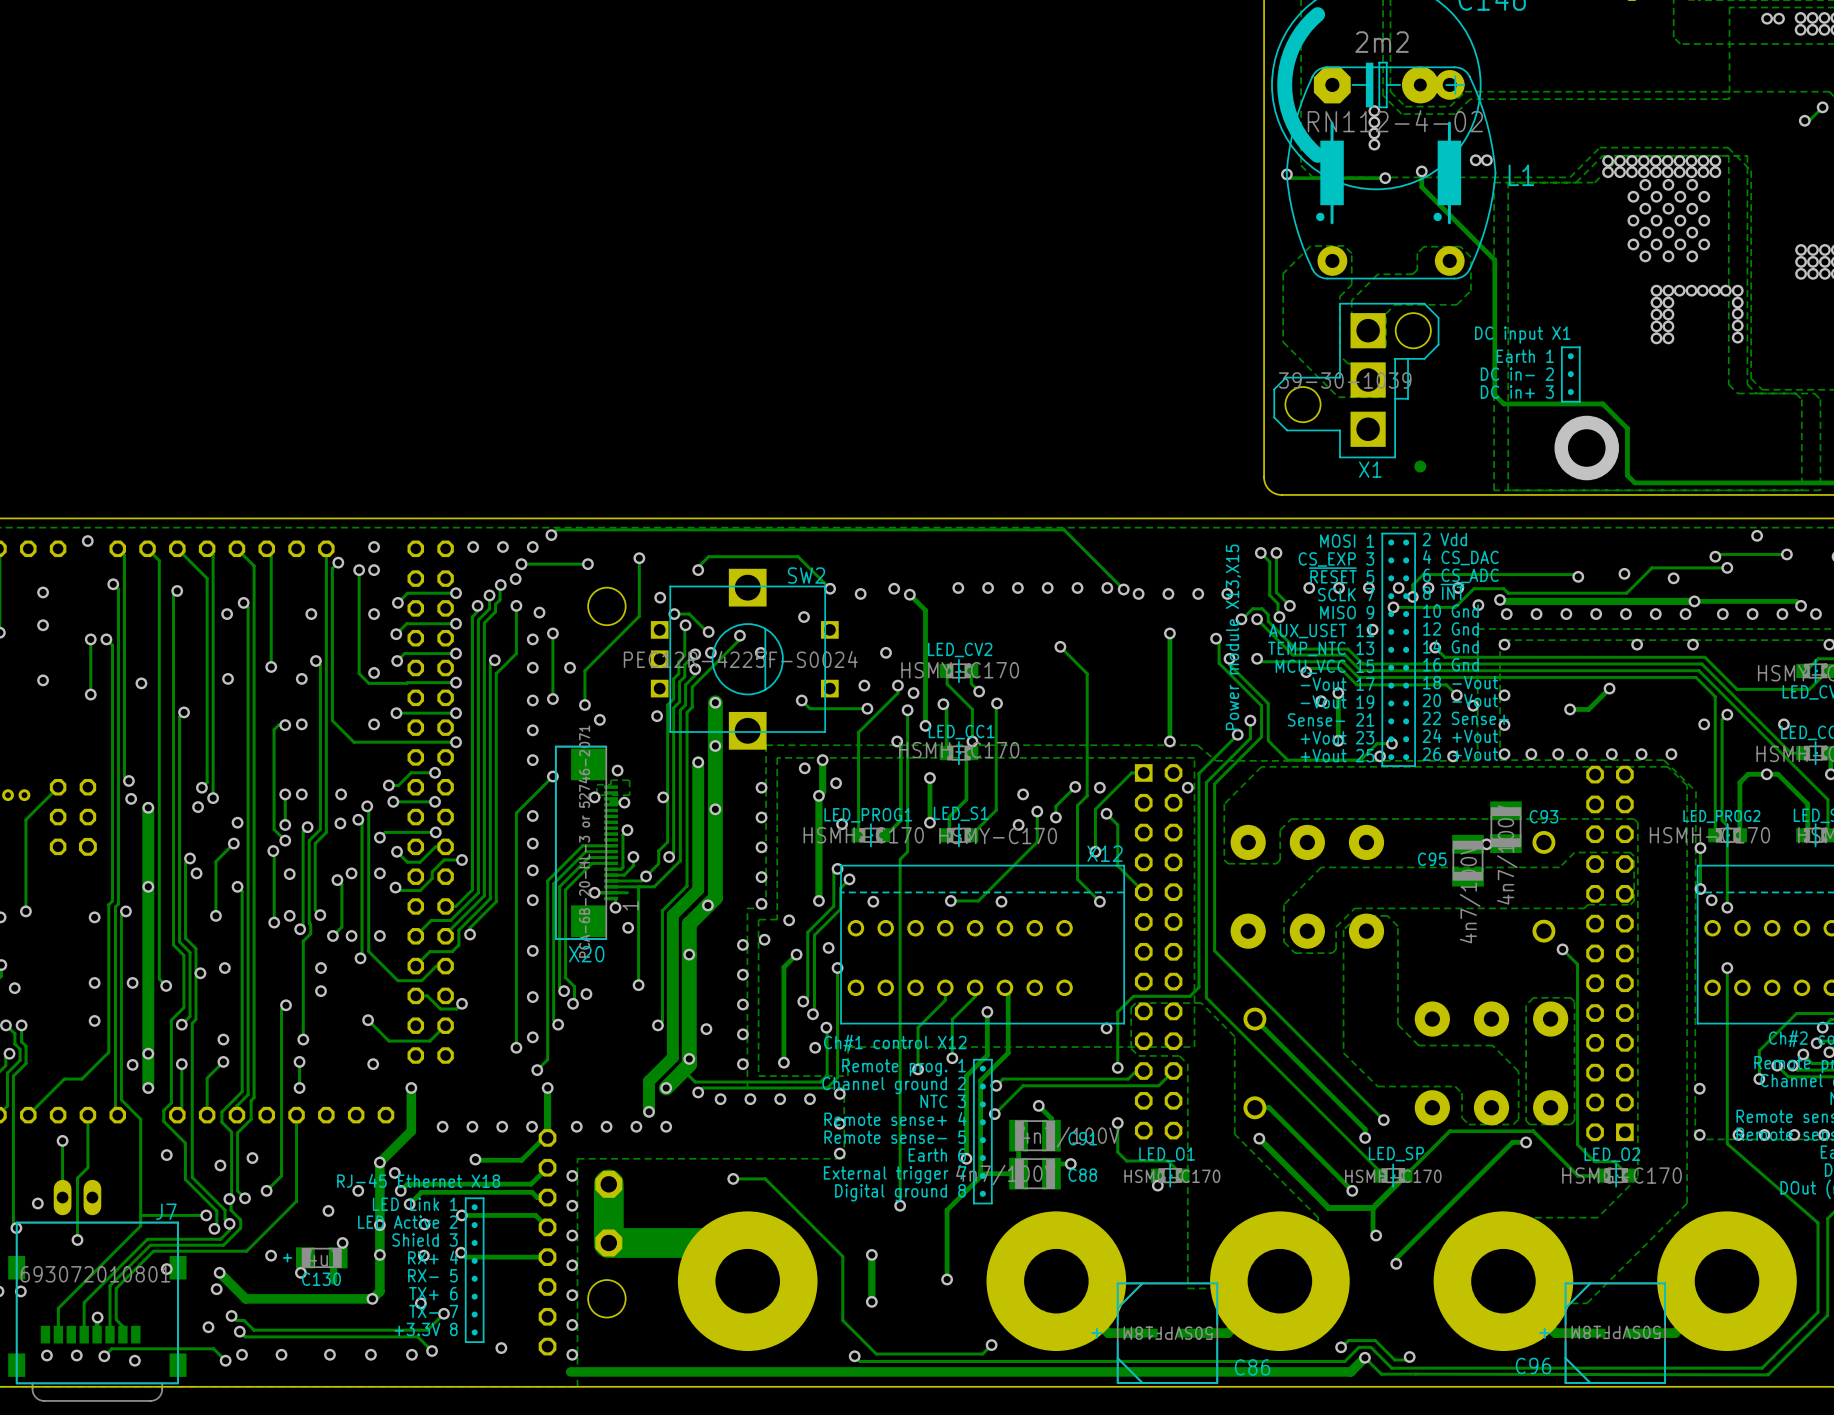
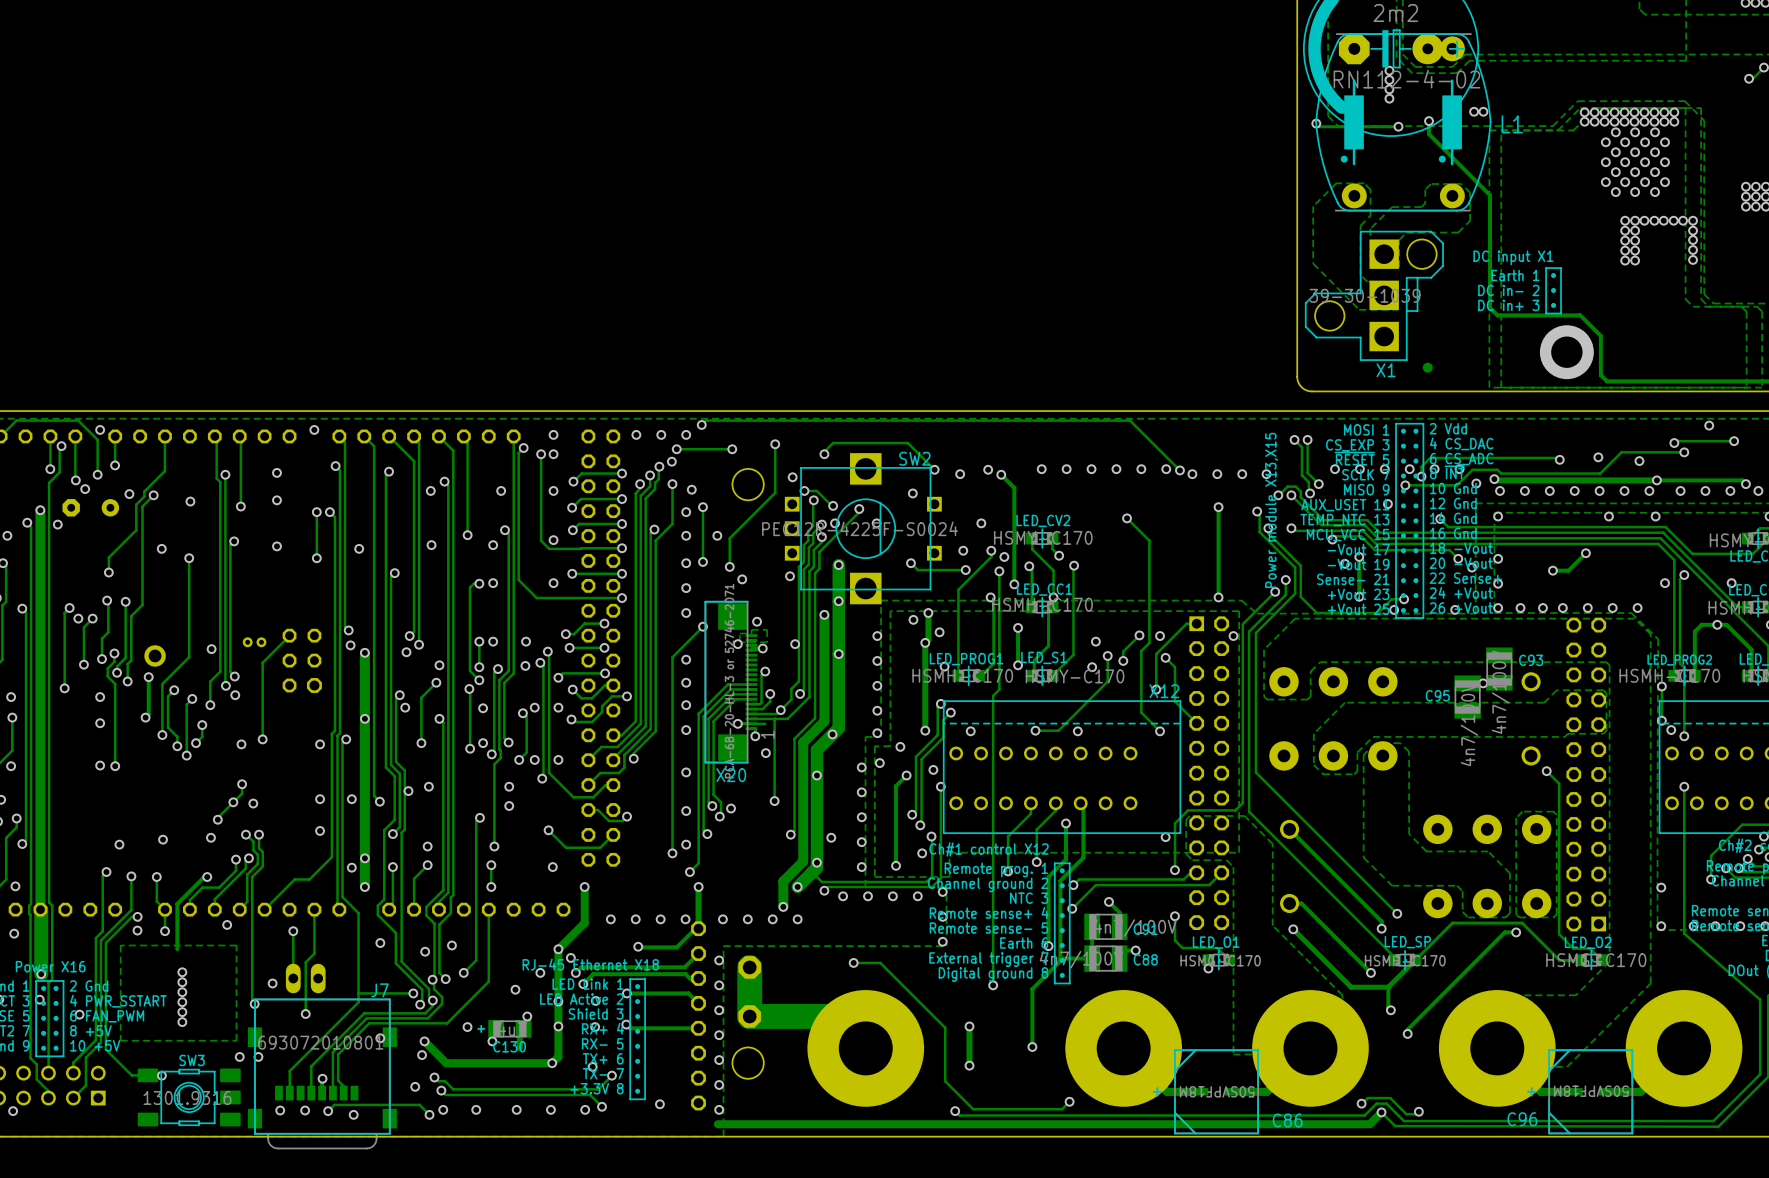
L1 footprint: [1285, 66, 1497, 280] -> [1315, 33, 1492, 212]

